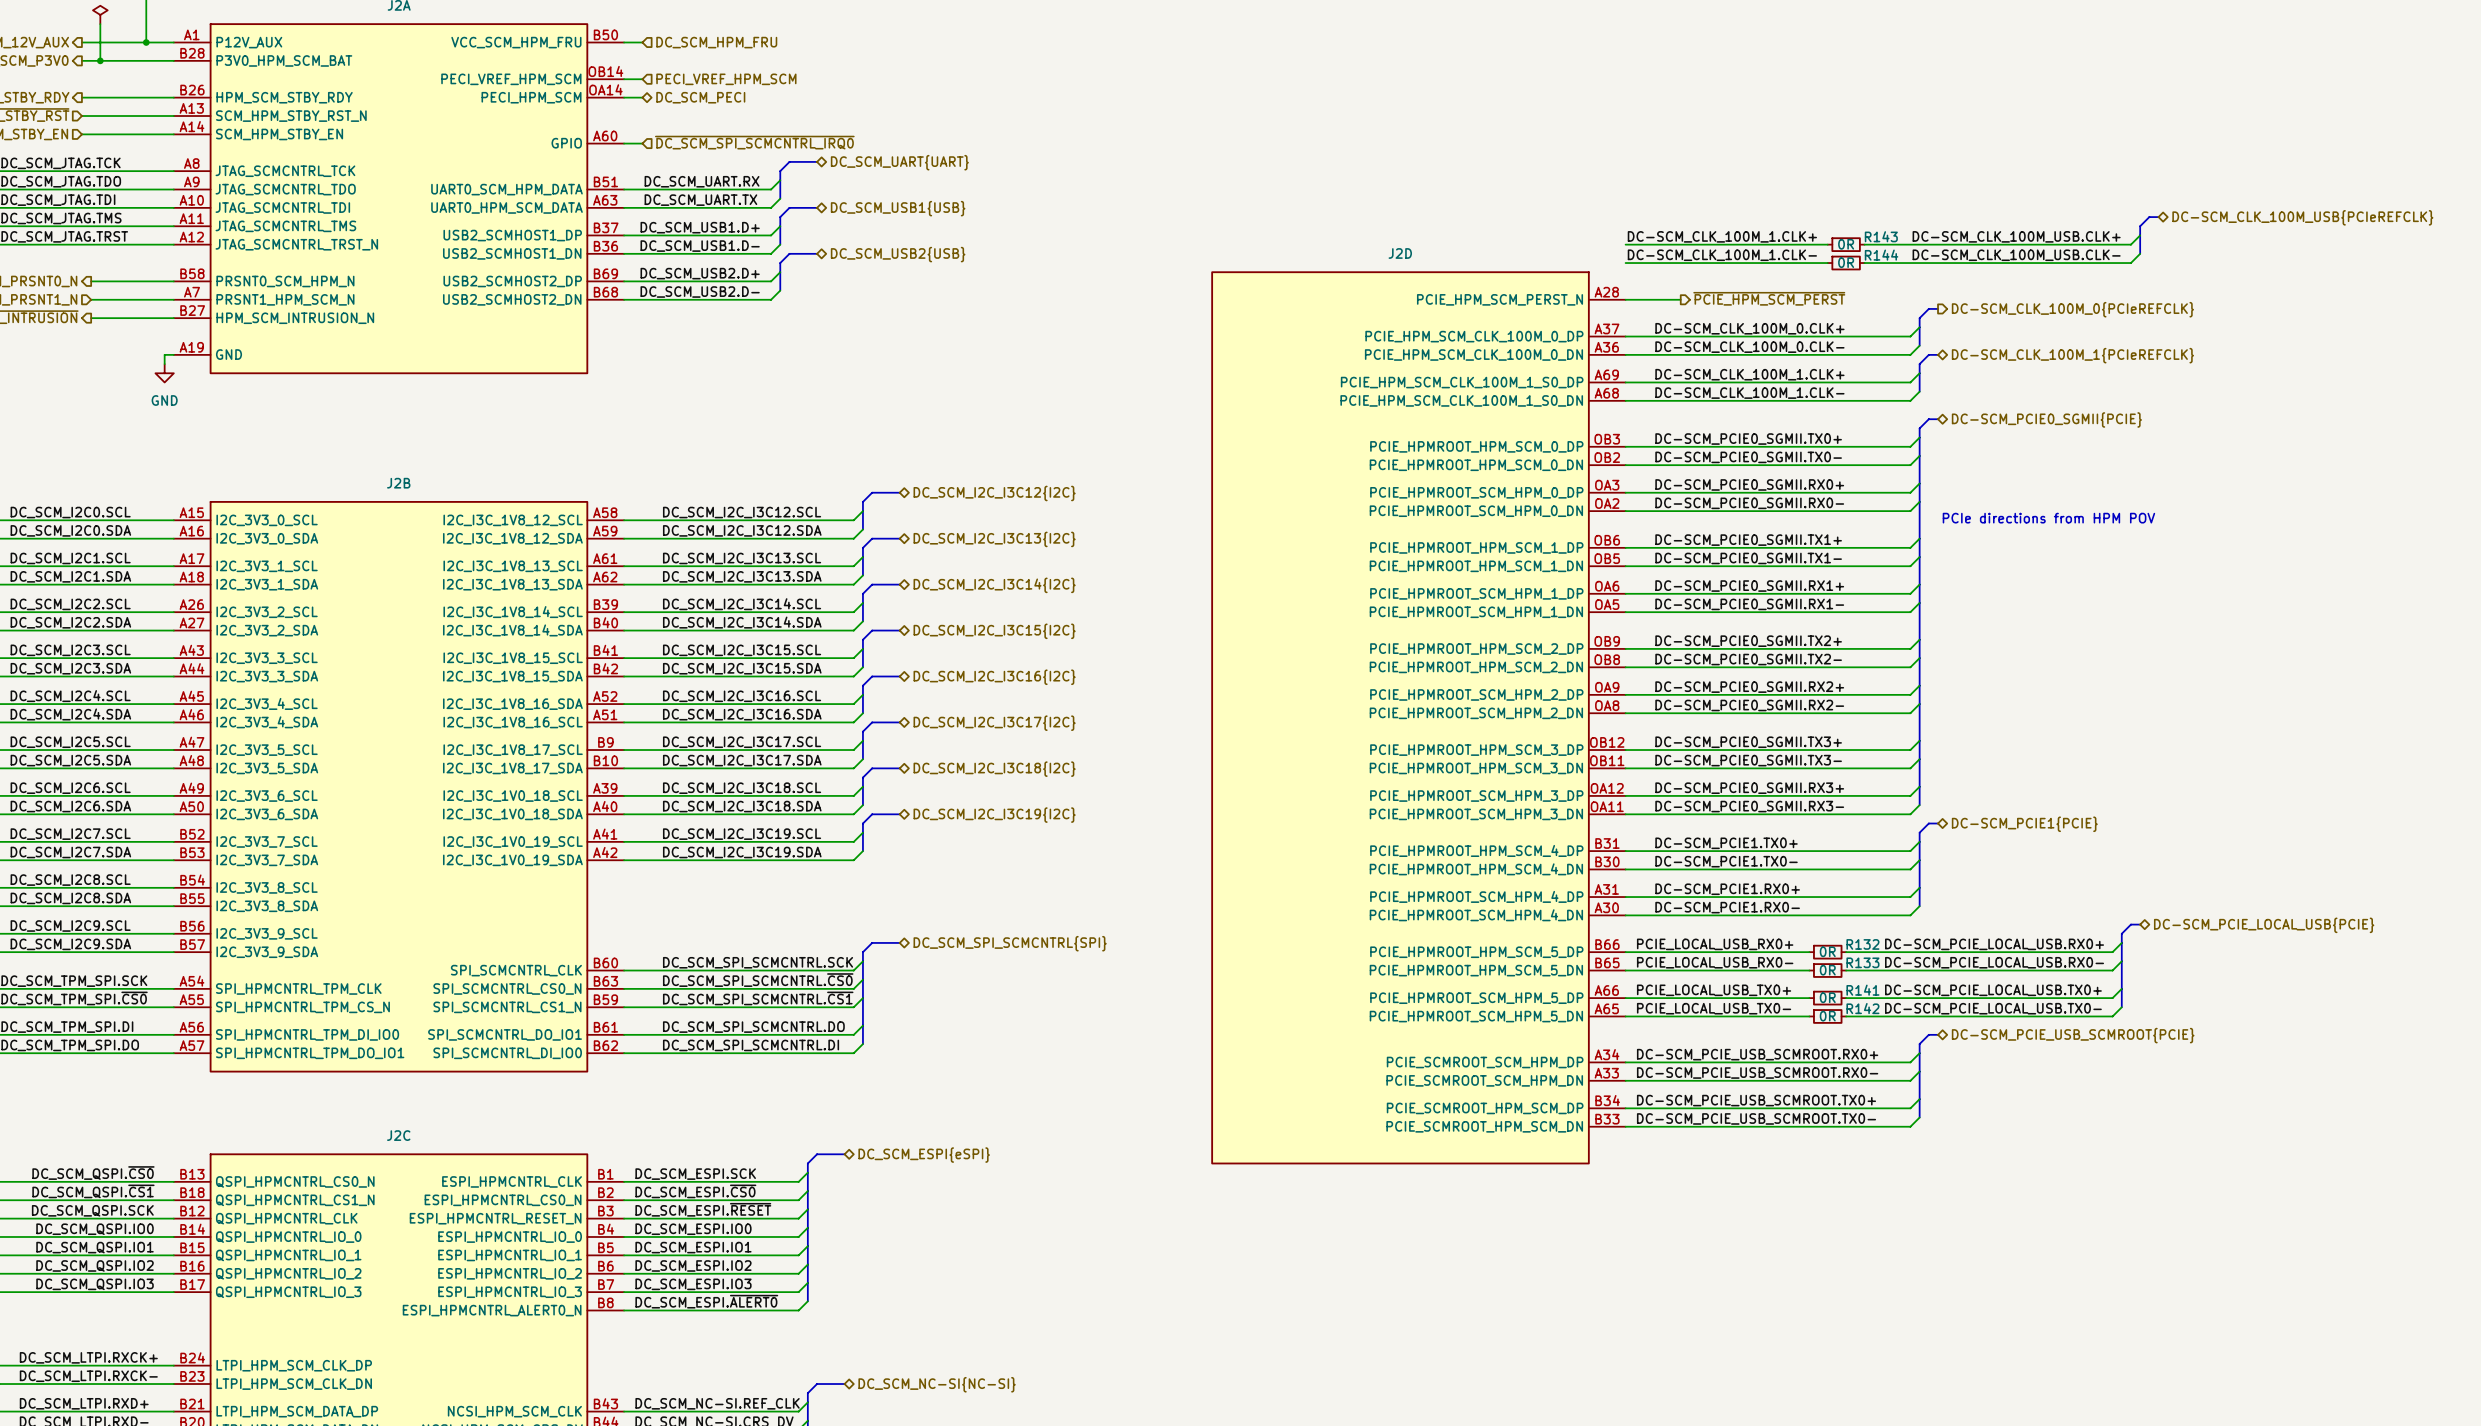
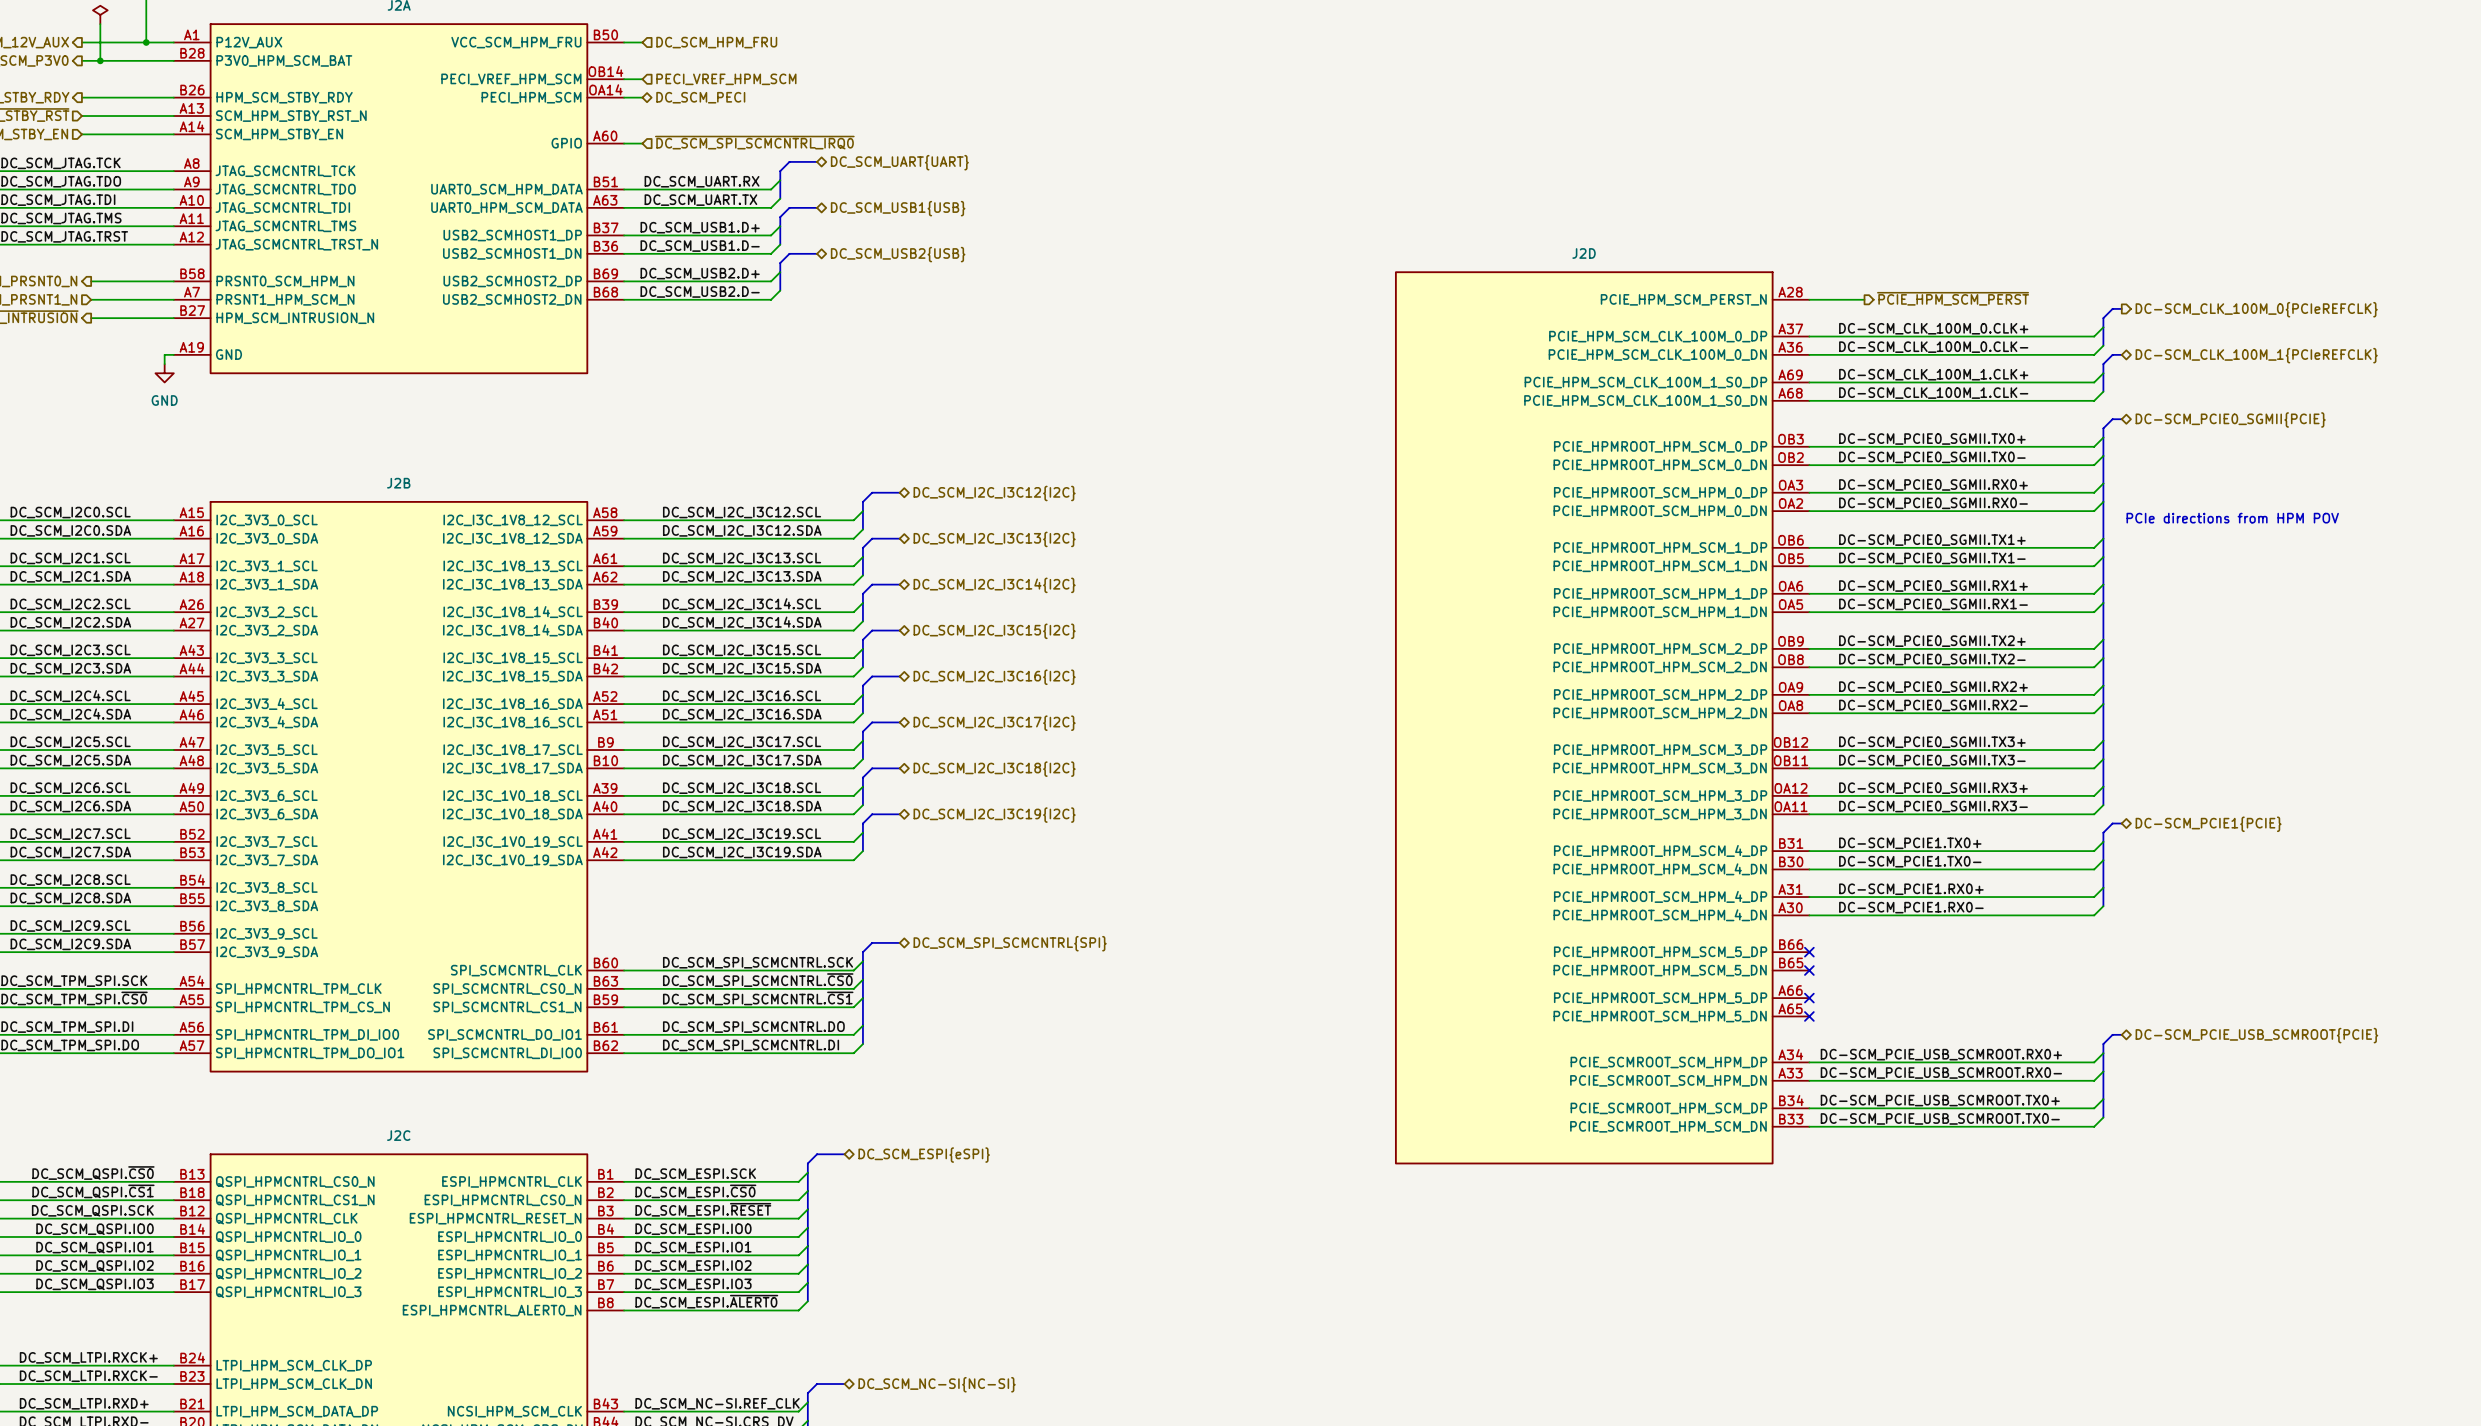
bus: (2158, 217) (2149, 217) (2140, 226) (2140, 253) -> (2121, 308) (2112, 308) (2103, 318) (2103, 345)
hierarchical label: DC-SCM_CLK_100M_USB{PCIeREFCLK} (2302, 217) -> none
wire: (2140, 235) (2130, 244) (1864, 244) -> none
label: DC-SCM_CLK_100M_1.CLK+ (1722, 236) -> none
label: DC-SCM_CLK_100M_USB.CLK+ (2016, 236) -> none
wire: (1625, 244) (1827, 244) -> none
R143: (1846, 244) -> none
wire: (2140, 253) (2130, 263) (1864, 263) -> none
label: DC-SCM_CLK_100M_1.CLK- (1722, 255) -> none
label: DC-SCM_CLK_100M_USB.CLK- (2016, 255) -> none
wire: (1625, 263) (1827, 263) -> none
R144: (1846, 263) -> none
hierarchical label: ~{PCIE_HPM_SCM_PERST} (1769, 298) -> none
hierarchical label: none -> ~{PCIE_HPM_SCM_PERST} (1953, 298)
wire: none -> (1809, 299) (1864, 299)
bus: (1938, 308) (1928, 308) (1919, 318) (1919, 345) -> none
hierarchical label: DC-SCM_CLK_100M_0{PCIeREFCLK} (2072, 309) -> none
hierarchical label: none -> DC-SCM_CLK_100M_0{PCIeREFCLK} (2256, 309)
wire: (1919, 327) (1910, 336) -> (2103, 327) (2094, 336) (1910, 336)
label: DC-SCM_CLK_100M_0.CLK+ (1749, 328) -> none
label: none -> DC-SCM_CLK_100M_0.CLK+ (1933, 328)
wire: (1919, 345) (1910, 354) -> (2103, 345) (2094, 354) (1910, 354)
label: DC-SCM_CLK_100M_0.CLK- (1749, 347) -> none
label: none -> DC-SCM_CLK_100M_0.CLK- (1933, 347)
bus: (1938, 354) (1928, 354) (1919, 364) (1919, 391) -> none
bus: none -> (2121, 354) (2112, 354) (2103, 364) (2103, 391)
hierarchical label: DC-SCM_CLK_100M_1{PCIeREFCLK} (2072, 355) -> none
hierarchical label: none -> DC-SCM_CLK_100M_1{PCIeREFCLK} (2256, 355)
wire: (1919, 373) (1910, 382) -> (2103, 373) (2094, 382) (1910, 382)
label: DC-SCM_CLK_100M_1.CLK+ (1749, 374) -> none
label: none -> DC-SCM_CLK_100M_1.CLK+ (1933, 374)
wire: (1919, 391) (1910, 400) -> (2103, 391) (2094, 400) (1910, 400)
label: DC-SCM_CLK_100M_1.CLK- (1749, 393) -> none
label: none -> DC-SCM_CLK_100M_1.CLK- (1933, 393)
bus: (1938, 419) (1928, 419) (1919, 428) (1919, 805) -> none
hierarchical label: DC-SCM_PCIE0_SGMII{PCIE} (2046, 419) -> none
bus: none -> (2121, 419) (2112, 419) (2103, 428) (2103, 805)
hierarchical label: none -> DC-SCM_PCIE0_SGMII{PCIE} (2230, 419)
wire: (1919, 437) (1910, 446) -> (2103, 437) (2094, 446) (1910, 446)
label: DC-SCM_PCIE0_SGMII.TX0+ (1748, 439) -> none
label: none -> DC-SCM_PCIE0_SGMII.TX0+ (1932, 439)
wire: (1919, 455) (1910, 465) -> (2103, 455) (2094, 465) (1910, 465)
label: DC-SCM_PCIE0_SGMII.TX0- (1748, 457) -> none
label: none -> DC-SCM_PCIE0_SGMII.TX0- (1932, 457)
wire: (1919, 483) (1910, 492) -> (2103, 483) (2094, 492) (1910, 492)
label: DC-SCM_PCIE0_SGMII.RX0+ (1749, 484) -> none
label: none -> DC-SCM_PCIE0_SGMII.RX0+ (1933, 484)
wire: (1919, 501) (1910, 511) -> (2103, 501) (2094, 511) (1910, 511)
label: DC-SCM_PCIE0_SGMII.RX0- (1749, 503) -> none
label: none -> DC-SCM_PCIE0_SGMII.RX0- (1933, 503)
text: PCIe directions from HPM POV (2048, 518) -> none
text: none -> PCIe directions from HPM POV (2232, 518)
wire: (1919, 538) (1910, 547) -> (2103, 538) (2094, 547) (1910, 547)
label: DC-SCM_PCIE0_SGMII.TX1+ (1748, 540) -> none
label: none -> DC-SCM_PCIE0_SGMII.TX1+ (1932, 540)
wire: (1919, 557) (1910, 566) -> (2103, 557) (2094, 566) (1910, 566)
label: DC-SCM_PCIE0_SGMII.TX1- (1748, 558) -> none
label: none -> DC-SCM_PCIE0_SGMII.TX1- (1932, 558)
wire: (1919, 584) (1910, 593) -> (2103, 584) (2094, 593) (1910, 593)
label: DC-SCM_PCIE0_SGMII.RX1+ (1749, 586) -> none
label: none -> DC-SCM_PCIE0_SGMII.RX1+ (1933, 586)
wire: (1919, 602) (1910, 612) -> (2103, 602) (2094, 612) (1910, 612)
label: DC-SCM_PCIE0_SGMII.RX1- (1749, 604) -> none
label: none -> DC-SCM_PCIE0_SGMII.RX1- (1933, 604)
wire: (1919, 639) (1910, 648) -> (2103, 639) (2094, 648) (1910, 648)
label: DC-SCM_PCIE0_SGMII.TX2+ (1748, 641) -> none
label: none -> DC-SCM_PCIE0_SGMII.TX2+ (1932, 641)
wire: (1919, 658) (1910, 667) -> (2103, 658) (2094, 667) (1910, 667)
label: DC-SCM_PCIE0_SGMII.TX2- (1748, 659) -> none
label: none -> DC-SCM_PCIE0_SGMII.TX2- (1932, 659)
wire: (1919, 685) (1910, 694) -> (2103, 685) (2094, 694) (1910, 694)
label: DC-SCM_PCIE0_SGMII.RX2+ (1749, 687) -> none
label: none -> DC-SCM_PCIE0_SGMII.RX2+ (1933, 687)
wire: (1919, 704) (1910, 713) -> (2103, 704) (2094, 713) (1910, 713)
label: DC-SCM_PCIE0_SGMII.RX2- (1749, 705) -> none
label: none -> DC-SCM_PCIE0_SGMII.RX2- (1933, 705)
J2D position: (1418, 717) -> (1602, 717)
wire: (1919, 740) (1910, 750) -> (2103, 740) (2094, 750) (1910, 750)
label: DC-SCM_PCIE0_SGMII.TX3+ (1748, 742) -> none
label: none -> DC-SCM_PCIE0_SGMII.TX3+ (1932, 742)
wire: (1919, 759) (1910, 768) -> (2103, 759) (2094, 768) (1910, 768)
label: DC-SCM_PCIE0_SGMII.TX3- (1748, 760) -> none
label: none -> DC-SCM_PCIE0_SGMII.TX3- (1932, 760)
wire: (1919, 786) (1910, 795) -> (2103, 786) (2094, 795) (1910, 795)
label: DC-SCM_PCIE0_SGMII.RX3+ (1749, 788) -> none
label: none -> DC-SCM_PCIE0_SGMII.RX3+ (1933, 788)
wire: (1919, 805) (1910, 814) -> (2103, 805) (2094, 814) (1910, 814)
label: DC-SCM_PCIE0_SGMII.RX3- (1749, 806) -> none
label: none -> DC-SCM_PCIE0_SGMII.RX3- (1933, 806)
bus: (1938, 823) (1928, 823) (1919, 832) (1919, 906) -> none
hierarchical label: DC-SCM_PCIE1{PCIE} (2024, 824) -> none
hierarchical label: none -> DC-SCM_PCIE1{PCIE} (2208, 824)
wire: (1919, 841) (1910, 851) -> (2103, 841) (2094, 851) (1910, 851)
label: DC-SCM_PCIE1.TX0+ (1726, 843) -> none
label: none -> DC-SCM_PCIE1.TX0+ (1910, 843)
wire: (1919, 860) (1910, 869) -> (2103, 860) (2094, 869) (1910, 869)
label: DC-SCM_PCIE1.TX0- (1726, 861) -> none
label: none -> DC-SCM_PCIE1.TX0- (1910, 861)
wire: (1919, 887) (1910, 897) -> (2103, 887) (2094, 897) (1910, 897)
label: DC-SCM_PCIE1.RX0+ (1727, 889) -> none
label: none -> DC-SCM_PCIE1.RX0+ (1911, 889)
wire: (1919, 906) (1910, 915) -> (2103, 906) (2094, 915) (1910, 915)
label: DC-SCM_PCIE1.RX0- (1727, 907) -> none
label: none -> DC-SCM_PCIE1.RX0- (1911, 907)
bus: (2140, 924) (2130, 924) (2121, 933) (2121, 1007) -> (2121, 823) (2112, 823) (2103, 832) (2103, 906)
hierarchical label: DC-SCM_PCIE_LOCAL_USB{PCIE} (2264, 925) -> none
wire: (2121, 942) (2112, 952) (1846, 952) -> none
label: PCIE_LOCAL_USB_RX0+ (1715, 944) -> none
label: DC-SCM_PCIE_LOCAL_USB.RX0+ (1994, 944) -> none
no-connect mark: none -> (1809, 952)
R132: (1827, 952) -> none
wire: (2121, 961) (2112, 970) (1846, 970) -> none
label: PCIE_LOCAL_USB_RX0- (1715, 962) -> none
label: DC-SCM_PCIE_LOCAL_USB.RX0- (1994, 962) -> none
no-connect mark: none -> (1809, 970)
R133: (1827, 970) -> none
wire: (2121, 988) (2112, 998) (1846, 998) -> none
label: PCIE_LOCAL_USB_TX0+ (1714, 990) -> none
label: DC-SCM_PCIE_LOCAL_USB.TX0+ (1993, 990) -> none
no-connect mark: none -> (1809, 998)
R141: (1827, 998) -> none
wire: (2121, 1007) (2112, 1016) (1846, 1016) -> none
label: PCIE_LOCAL_USB_TX0- (1714, 1008) -> none
label: DC-SCM_PCIE_LOCAL_USB.TX0- (1993, 1008) -> none
no-connect mark: none -> (1809, 1016)
R142: (1827, 1016) -> none
bus: (1938, 1034) (1928, 1034) (1919, 1044) (1919, 1117) -> none
bus: none -> (2121, 1034) (2112, 1034) (2103, 1044) (2103, 1117)
hierarchical label: DC-SCM_PCIE_USB_SCMROOT{PCIE} (2073, 1035) -> none
hierarchical label: none -> DC-SCM_PCIE_USB_SCMROOT{PCIE} (2256, 1035)
wire: (1919, 1053) (1910, 1062) -> (2103, 1053) (2094, 1062) (1910, 1062)
label: DC-SCM_PCIE_USB_SCMROOT.RX0+ (1757, 1054) -> none
label: none -> DC-SCM_PCIE_USB_SCMROOT.RX0+ (1941, 1054)
wire: (1919, 1071) (1910, 1080) -> (2103, 1071) (2094, 1080) (1910, 1080)
label: DC-SCM_PCIE_USB_SCMROOT.RX0- (1757, 1073) -> none
label: none -> DC-SCM_PCIE_USB_SCMROOT.RX0- (1941, 1073)
wire: (1919, 1099) (1910, 1108) -> (2103, 1099) (2094, 1108) (1910, 1108)
label: DC-SCM_PCIE_USB_SCMROOT.TX0+ (1756, 1100) -> none
label: none -> DC-SCM_PCIE_USB_SCMROOT.TX0+ (1940, 1100)
wire: (1919, 1117) (1910, 1126) -> (2103, 1117) (2094, 1126) (1910, 1126)
label: DC-SCM_PCIE_USB_SCMROOT.TX0- (1756, 1118) -> none
label: none -> DC-SCM_PCIE_USB_SCMROOT.TX0- (1940, 1118)

